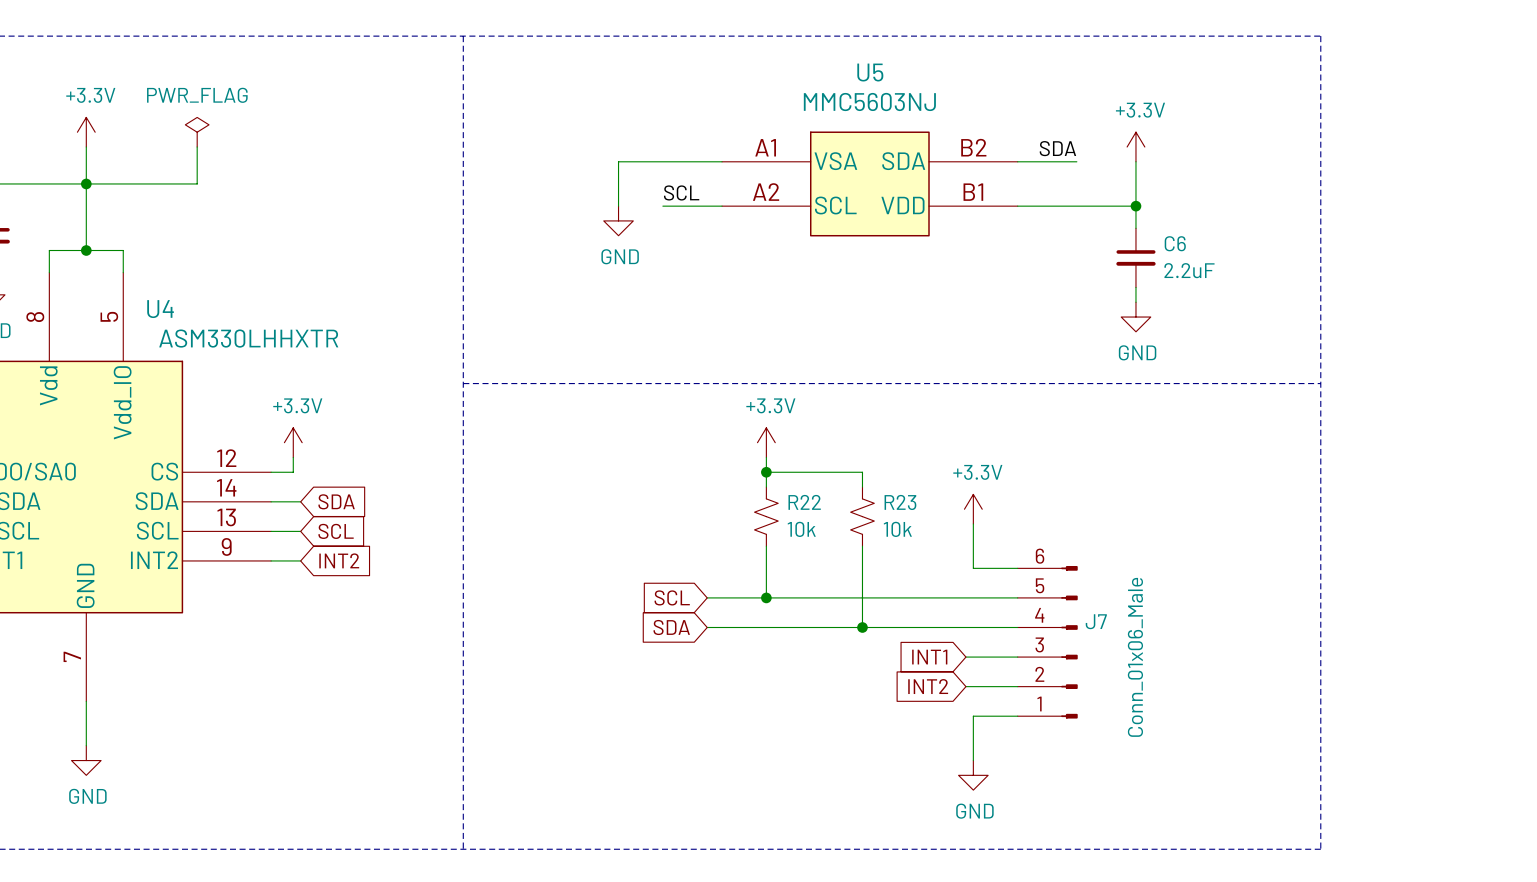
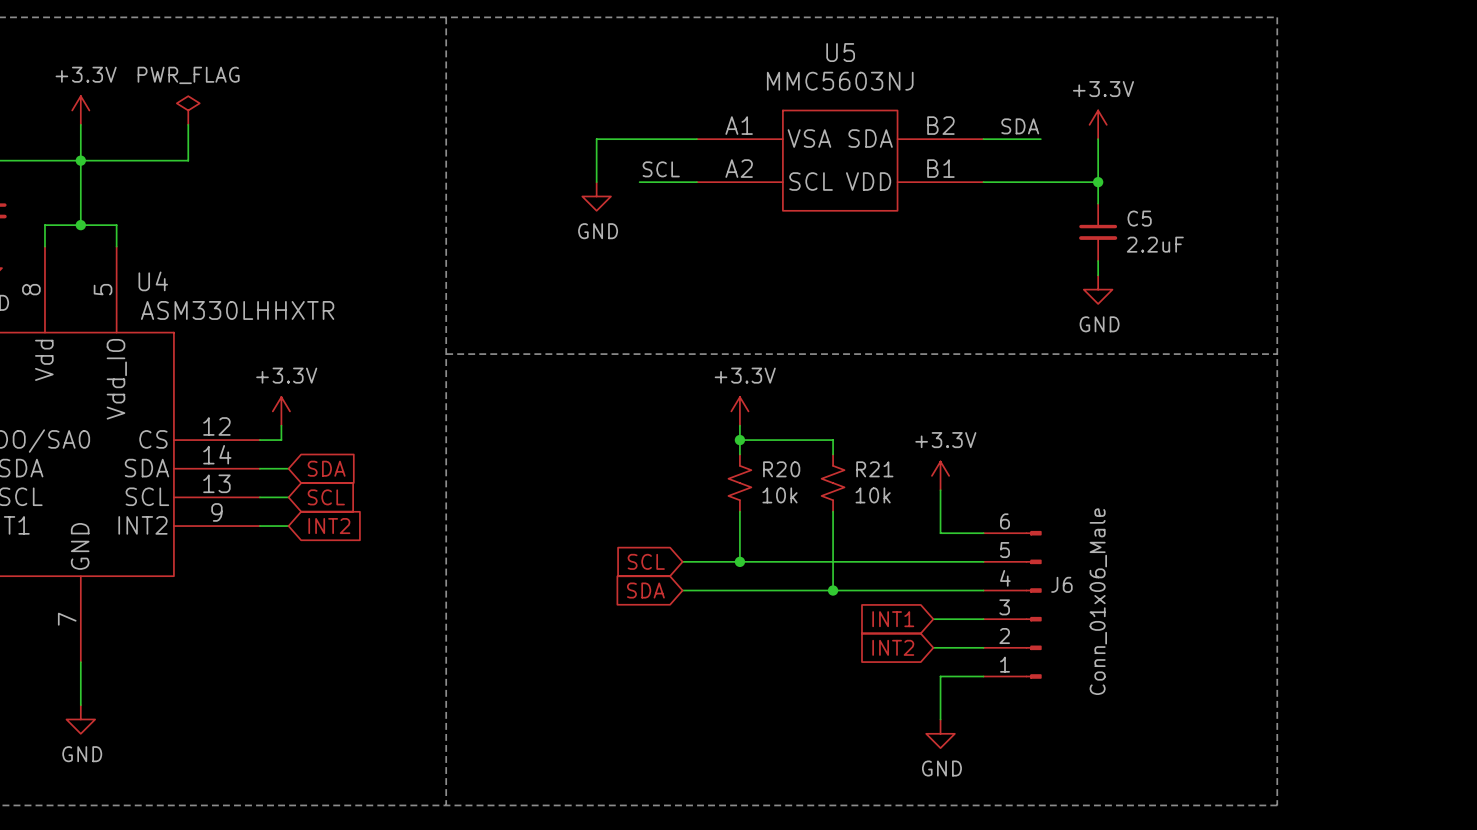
C6 name: C6 (1175, 243) -> C5 (1139, 218)
R22 name: R22 (804, 502) -> R20 (781, 469)
R23 name: R23 (900, 502) -> R21 (874, 469)
J7 name: J7 (1096, 621) -> J6 (1061, 584)

